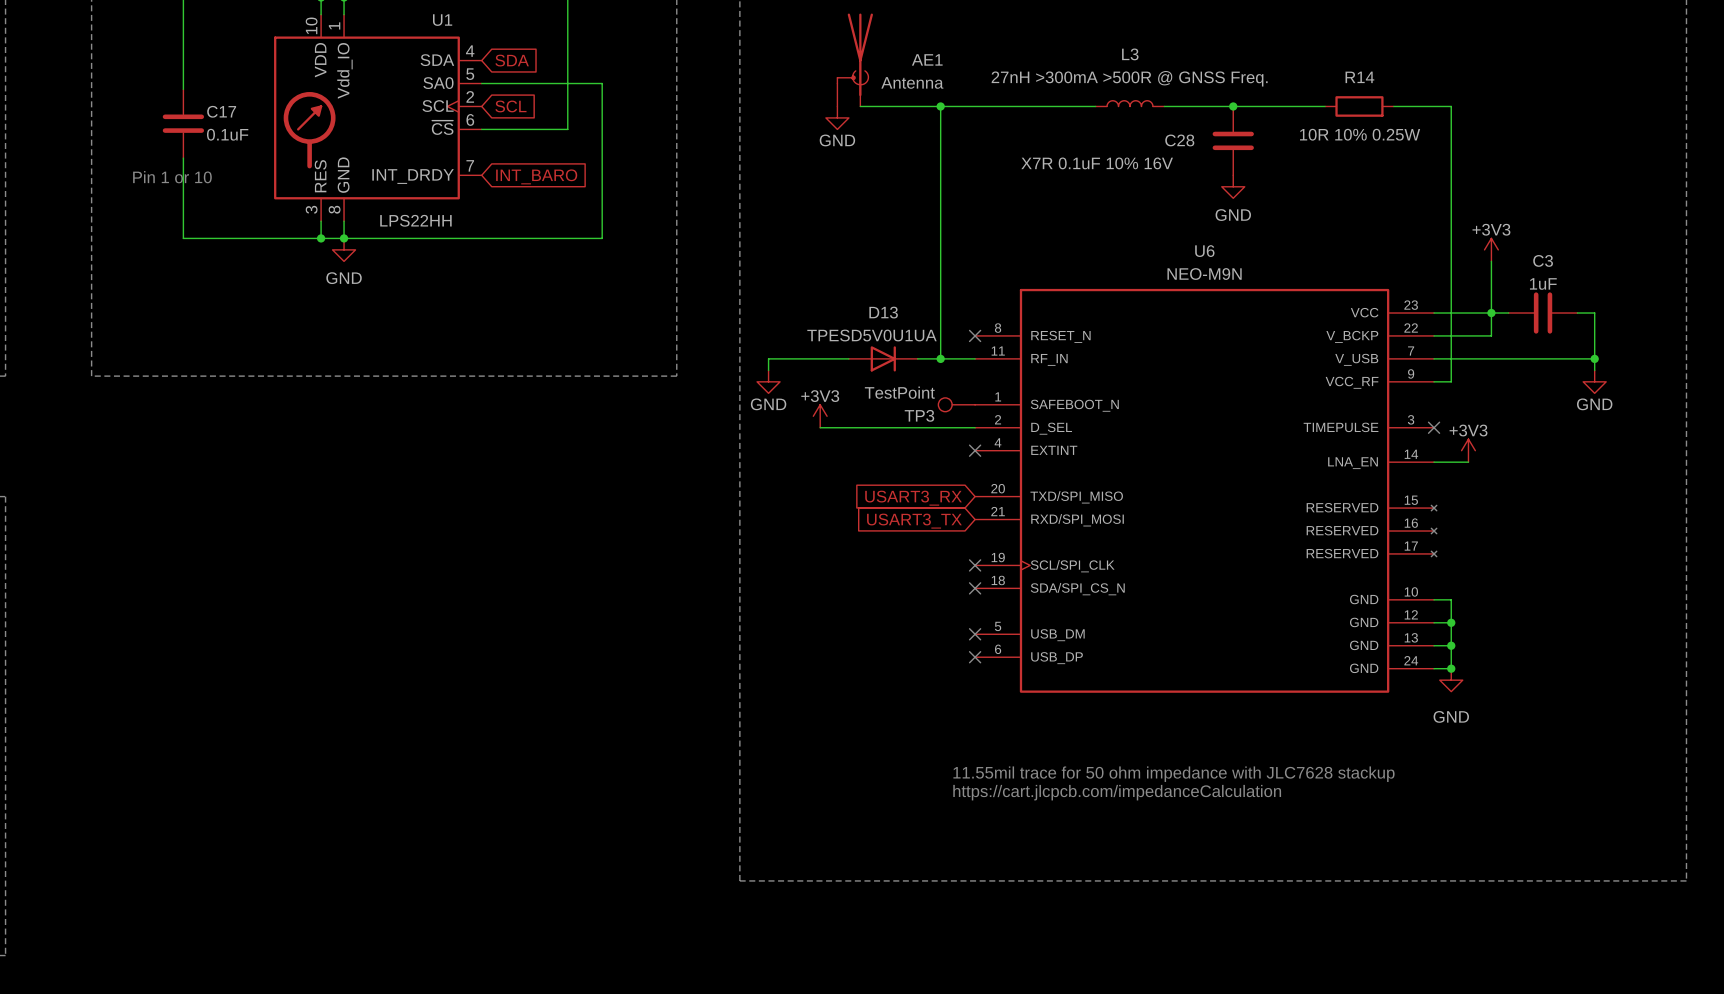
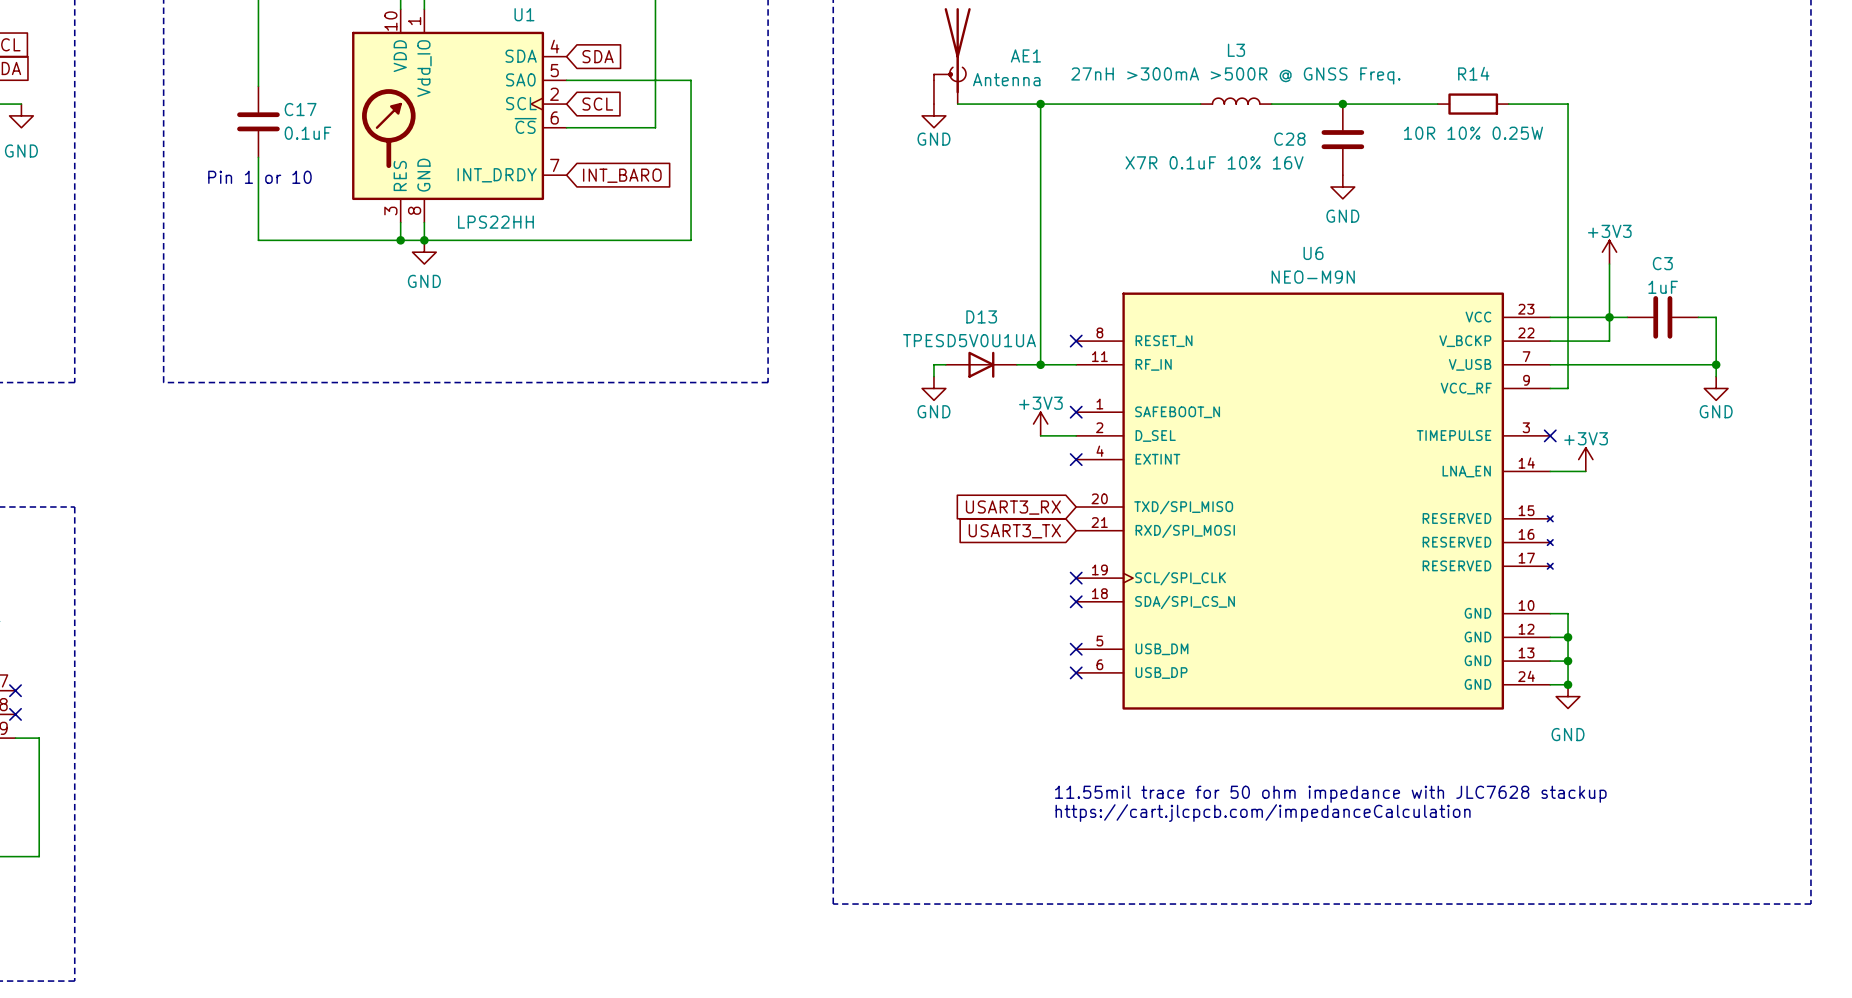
wire: (837, 358) (768, 358) (768, 370) -> (933, 364) (933, 376)
power symbol position: GND (768, 381) -> GND (933, 388)
TP3: TestPoint (956, 404) -> none
no-connect mark: none -> (1076, 412)
power symbol position: +3V3 (820, 416) -> +3V3 (1040, 424)
wire: (820, 427) (940, 427) -> none

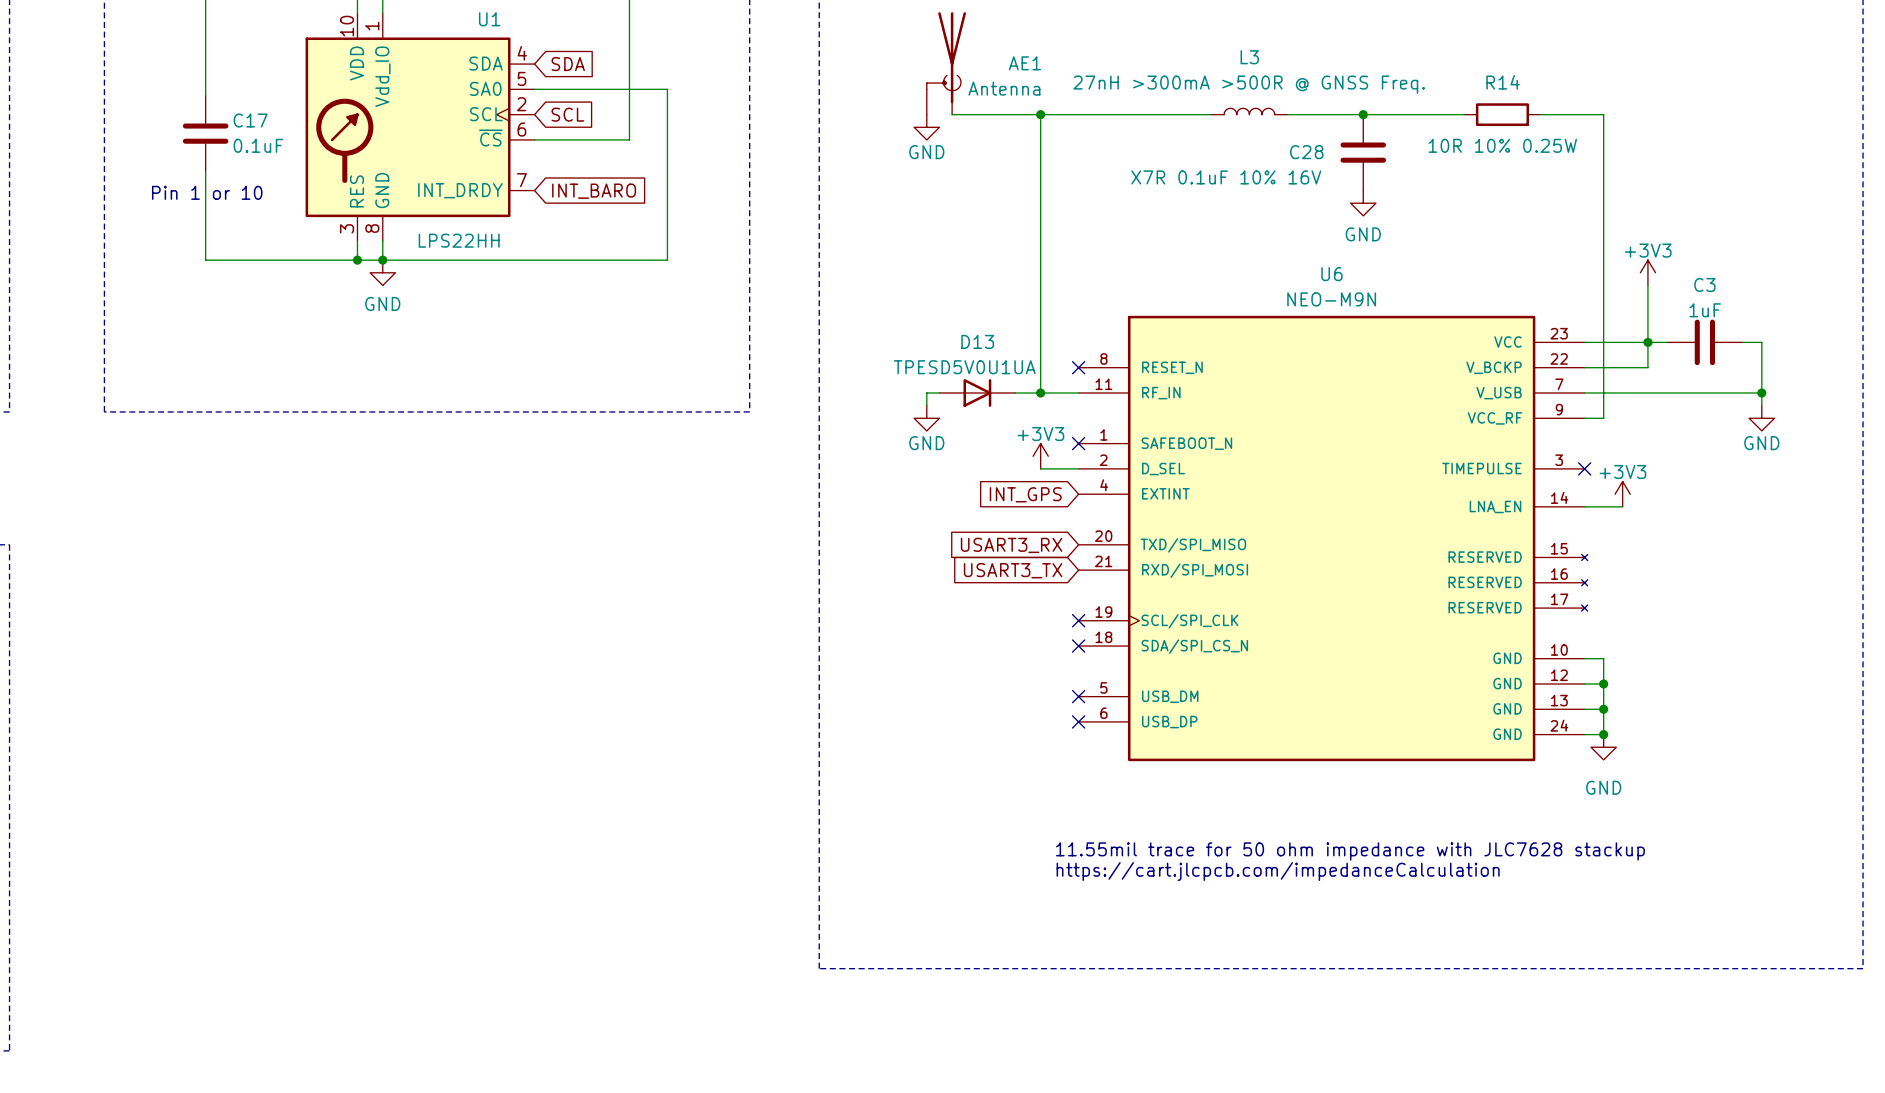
no-connect mark: (1076, 459) -> none
global label: none -> INT_GPS (1025, 494)

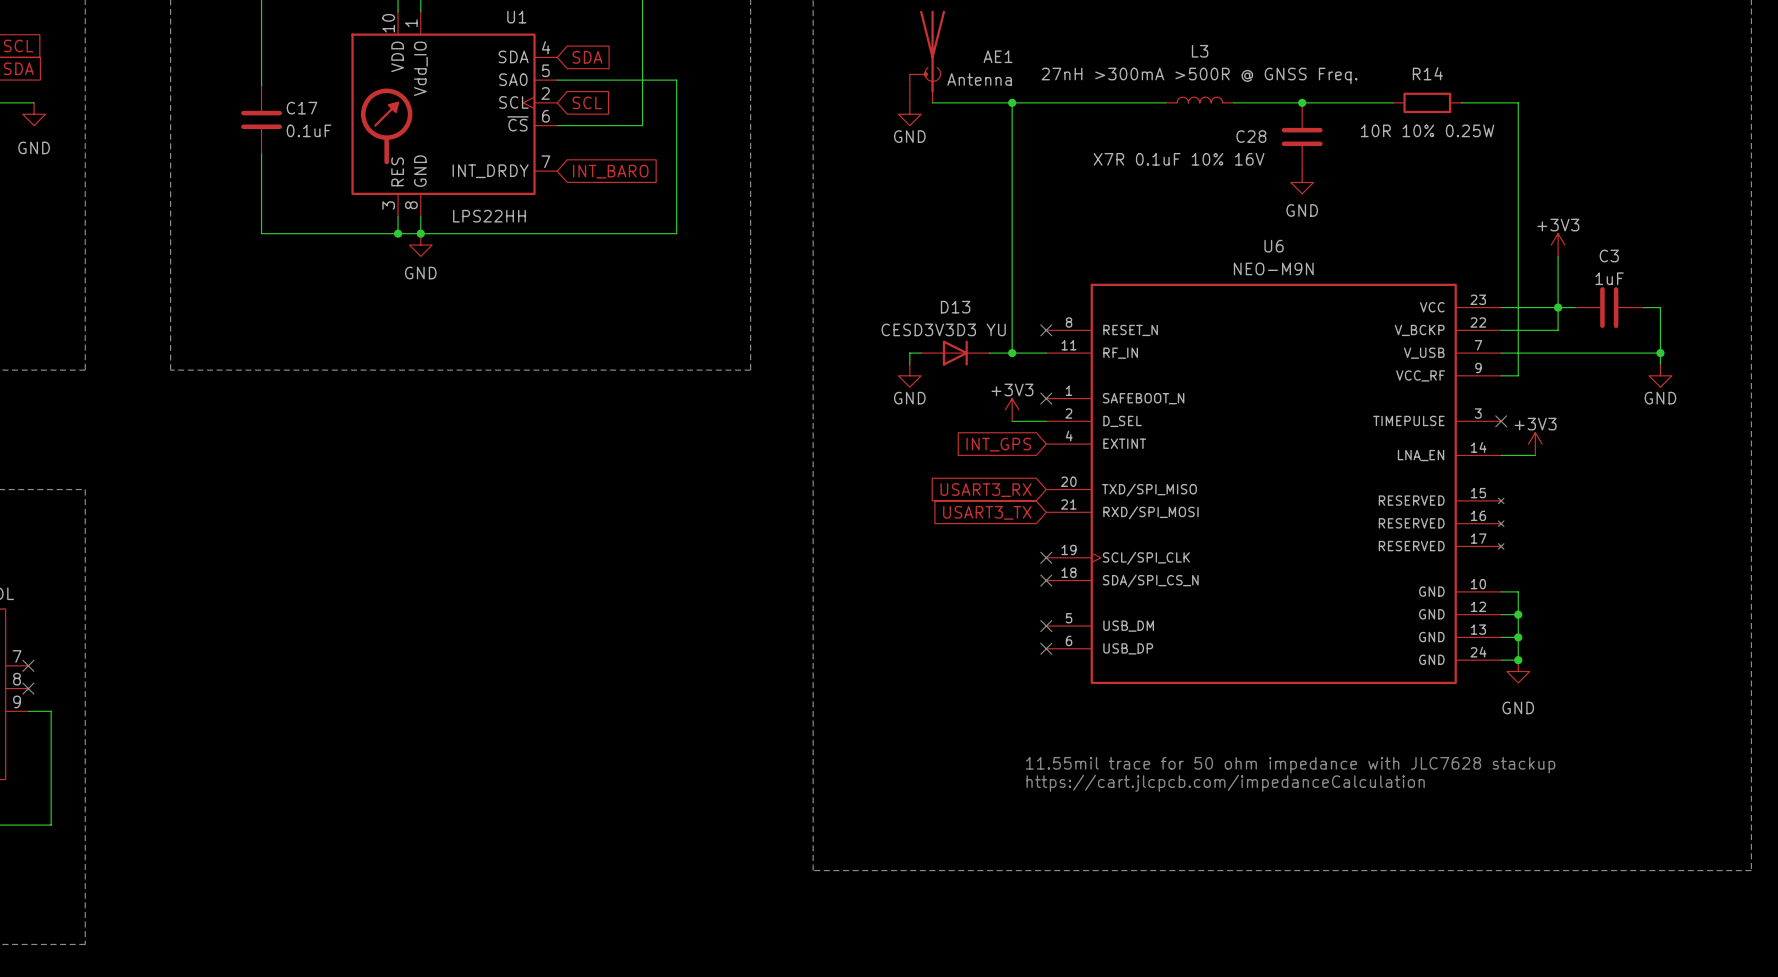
text: Pin 1 or 10 (207, 192) -> none
D13 value: TPESD5V0U1UA (964, 367) -> CESD3V3D3 YU (943, 329)

